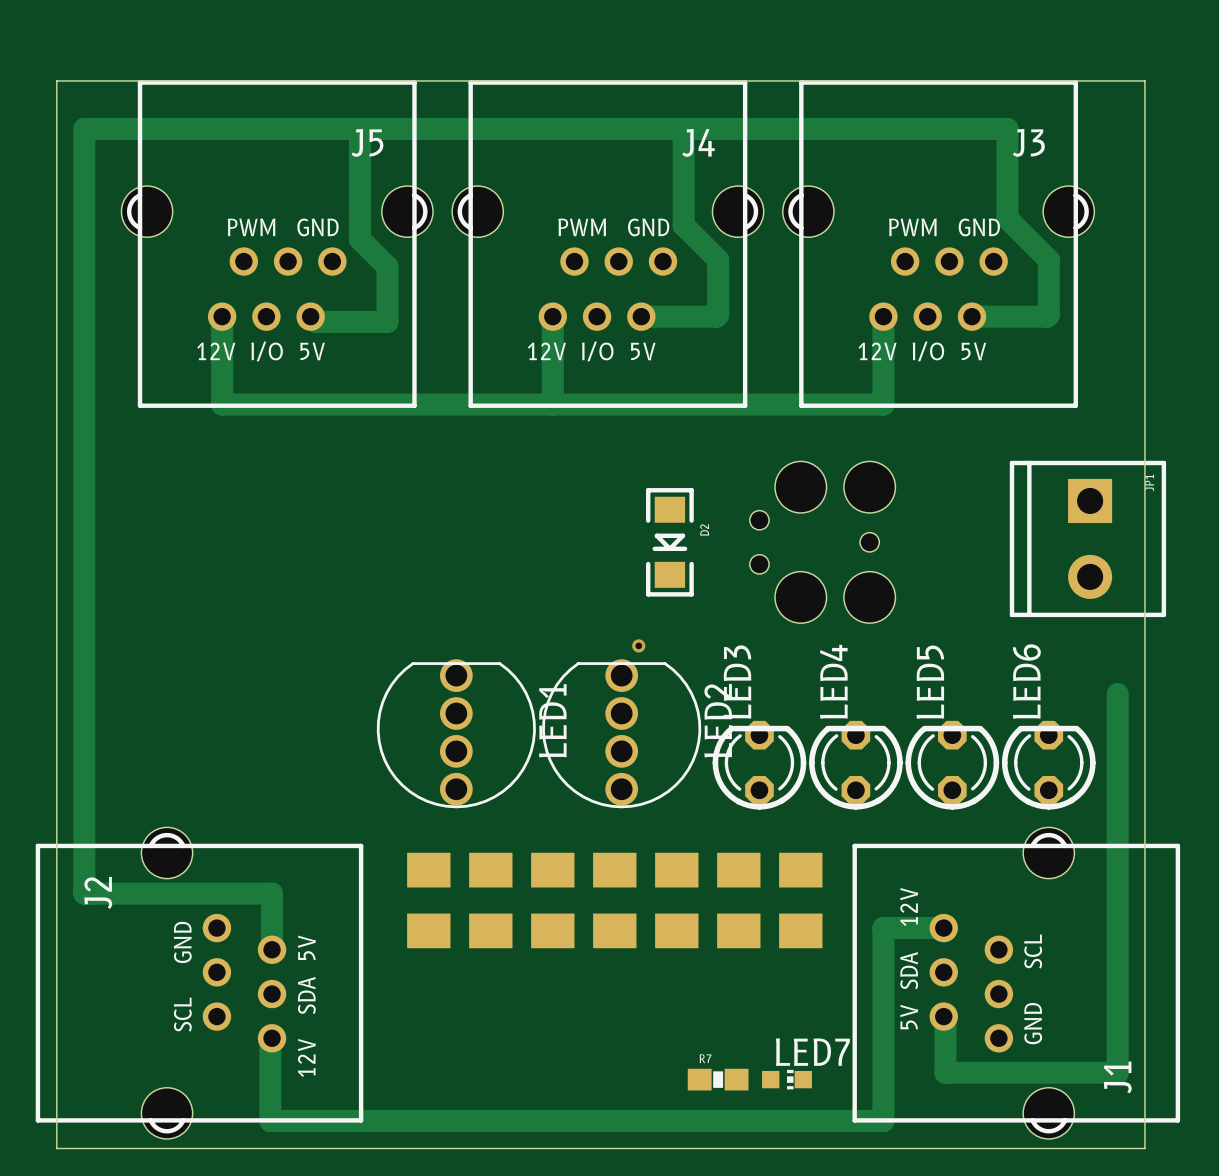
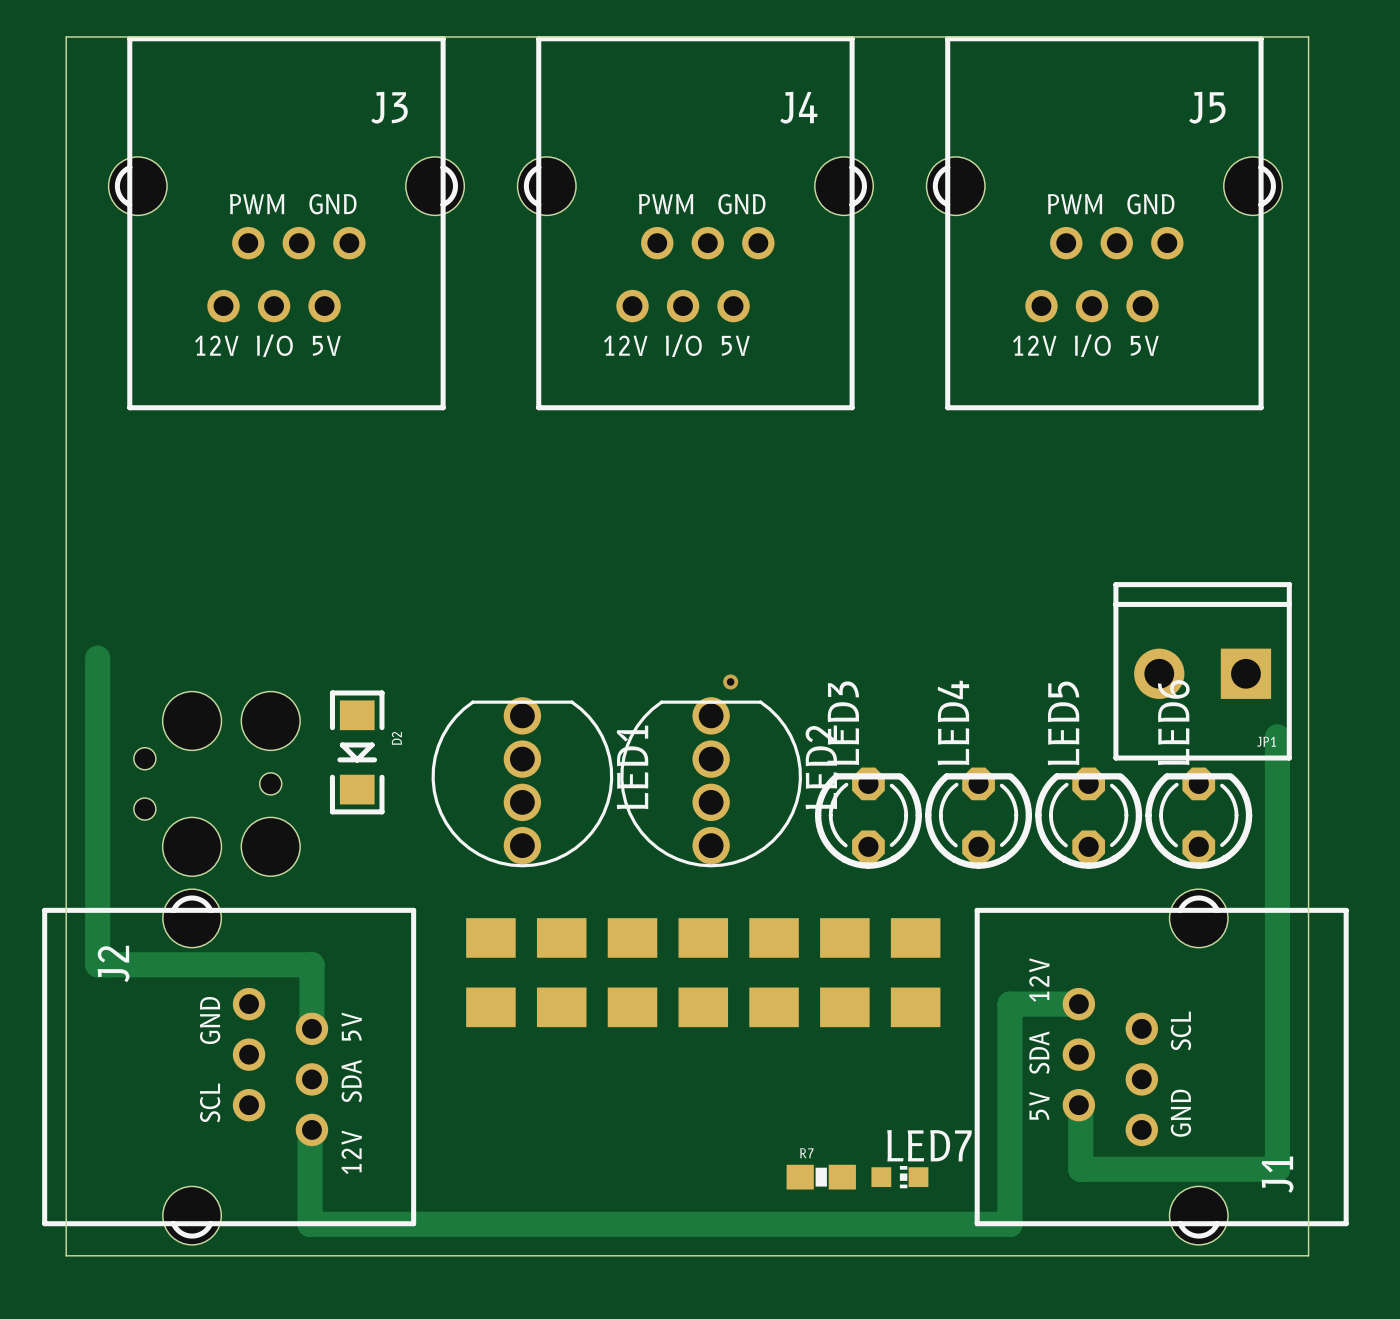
track: (359, 128) (359, 239) (387, 266) (387, 321) (315, 321) (310, 316) -> none
track: (683, 128) (683, 225) (718, 259) (718, 314) (716, 316) (641, 316) -> none
J5 position: (277, 244) -> (1104, 223)
J3 position: (938, 244) -> (286, 223)
track: (222, 316) (222, 404) (883, 404) (883, 316) -> none
track: (552, 316) (552, 404) -> none
track: (971, 316) (1047, 316) (1048, 314) (1048, 259) (1007, 218) (1007, 128) (84, 128) (84, 624) -> none
JP1 rotation: 0° (1087, 538) -> 90° clockwise (1202, 671)
JP1 position: (1087, 538) -> (1202, 671)
D2 position: (669, 542) -> (357, 752)
part: (822, 542) -> none
part: none -> (217, 783)

